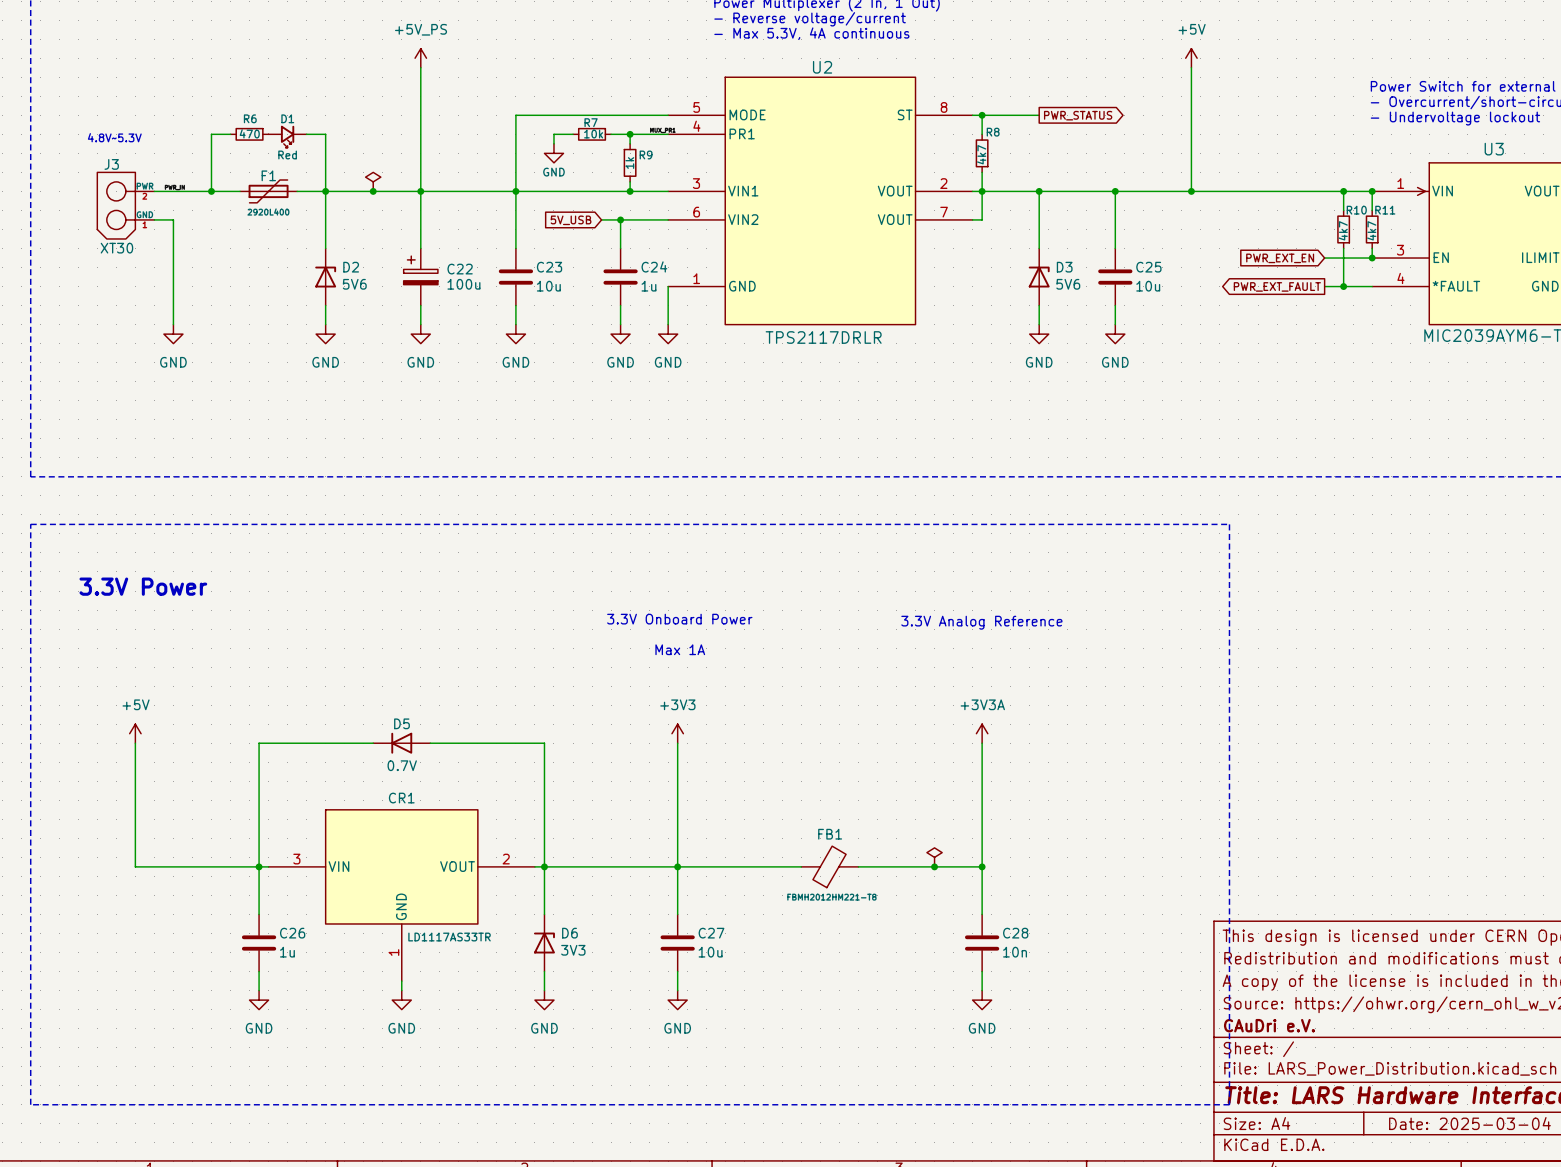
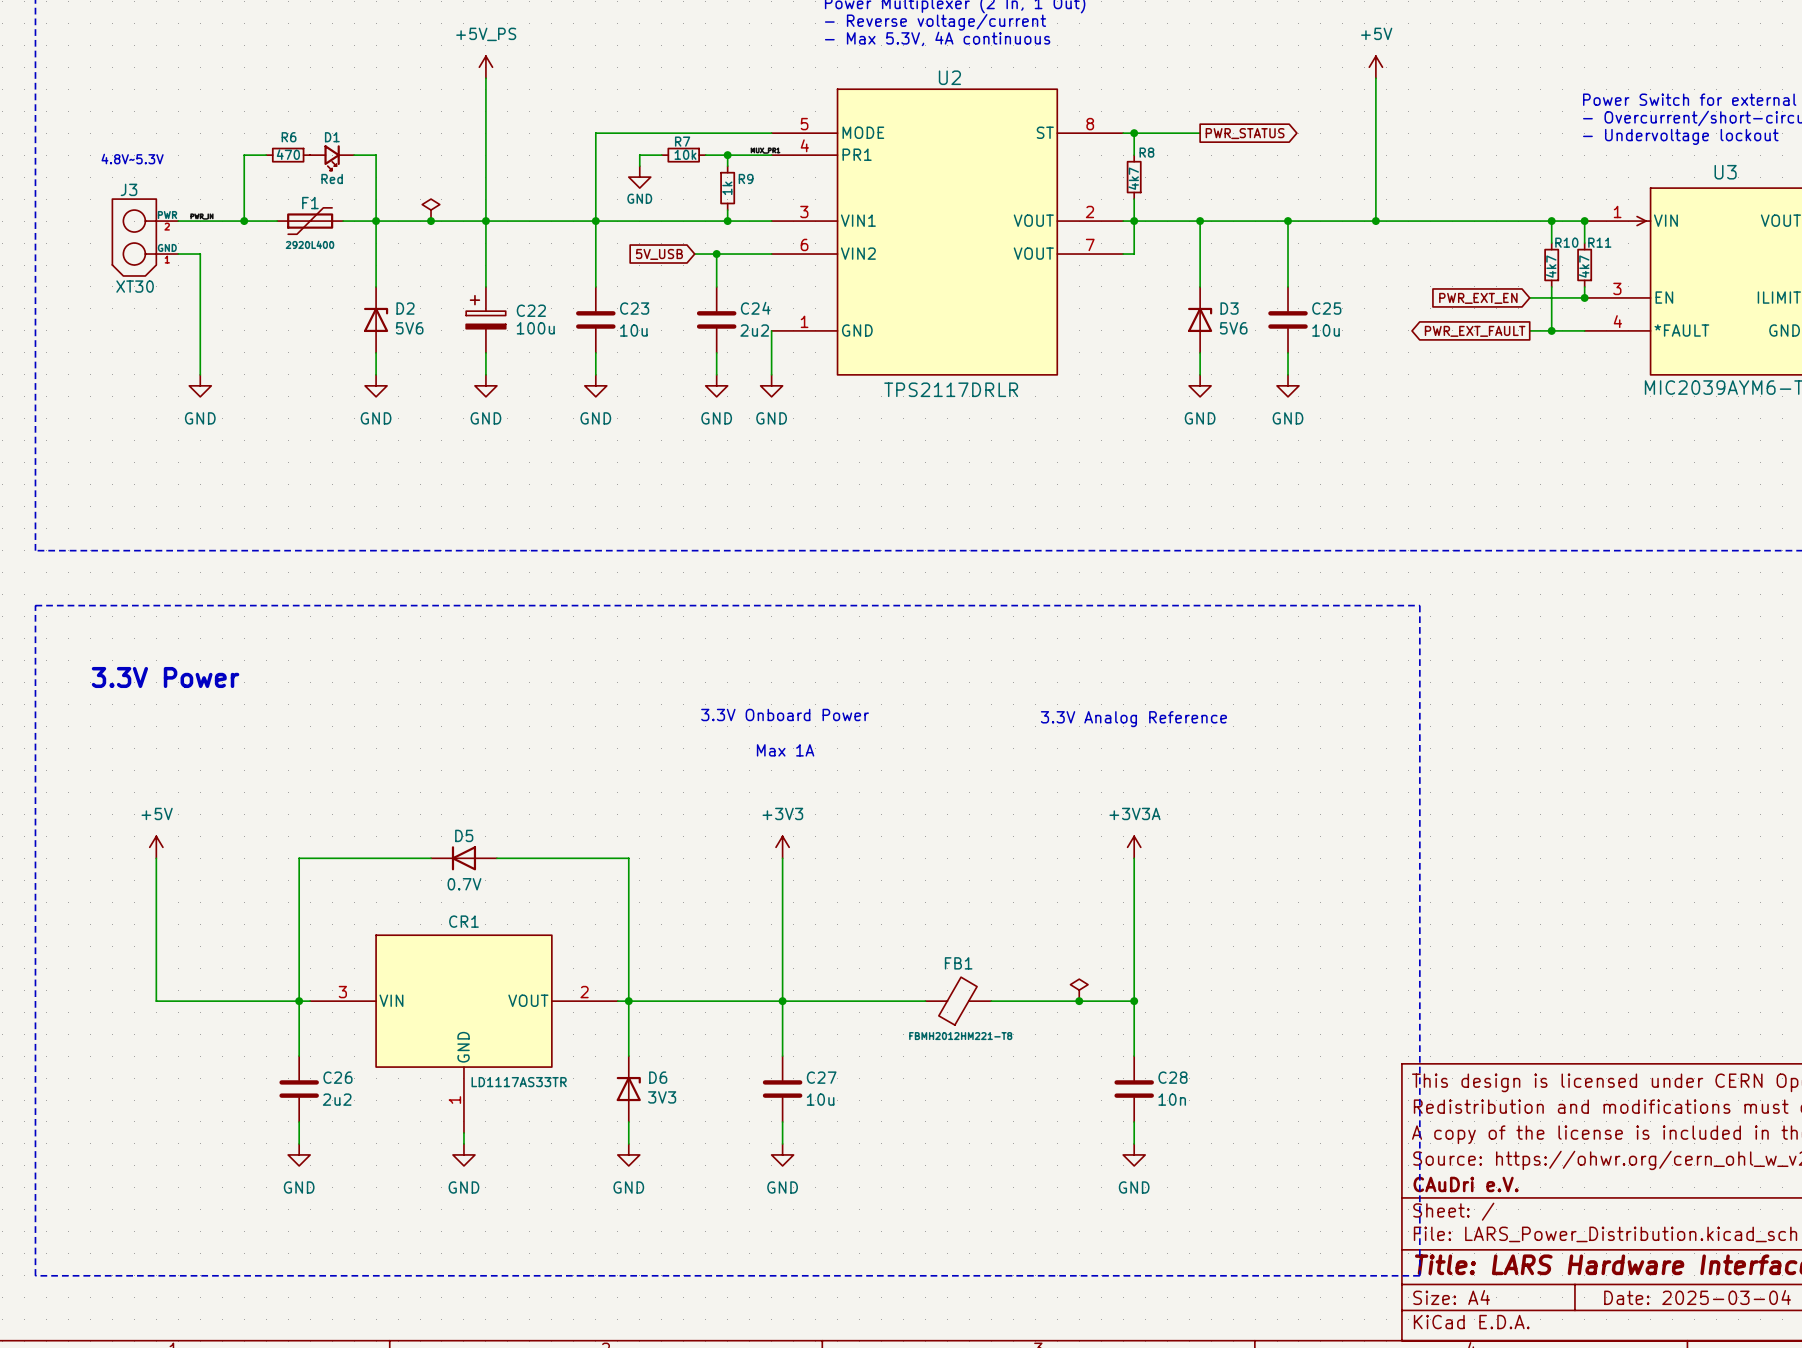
C24 value: 1u (648, 286) -> 2u2 (754, 330)
C26 value: 1u (287, 952) -> 2u2 (337, 1099)

